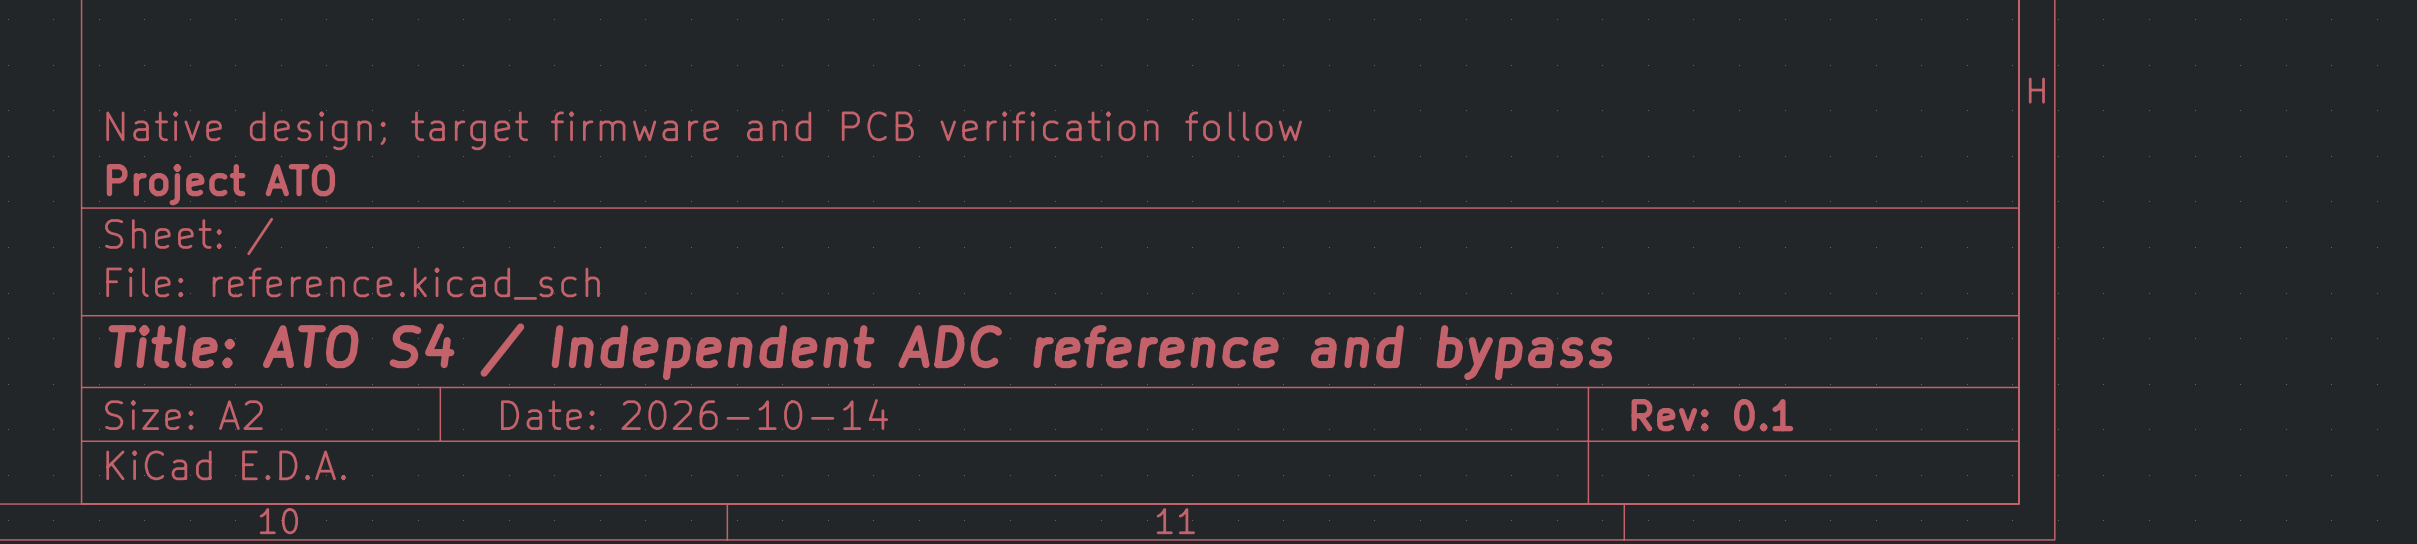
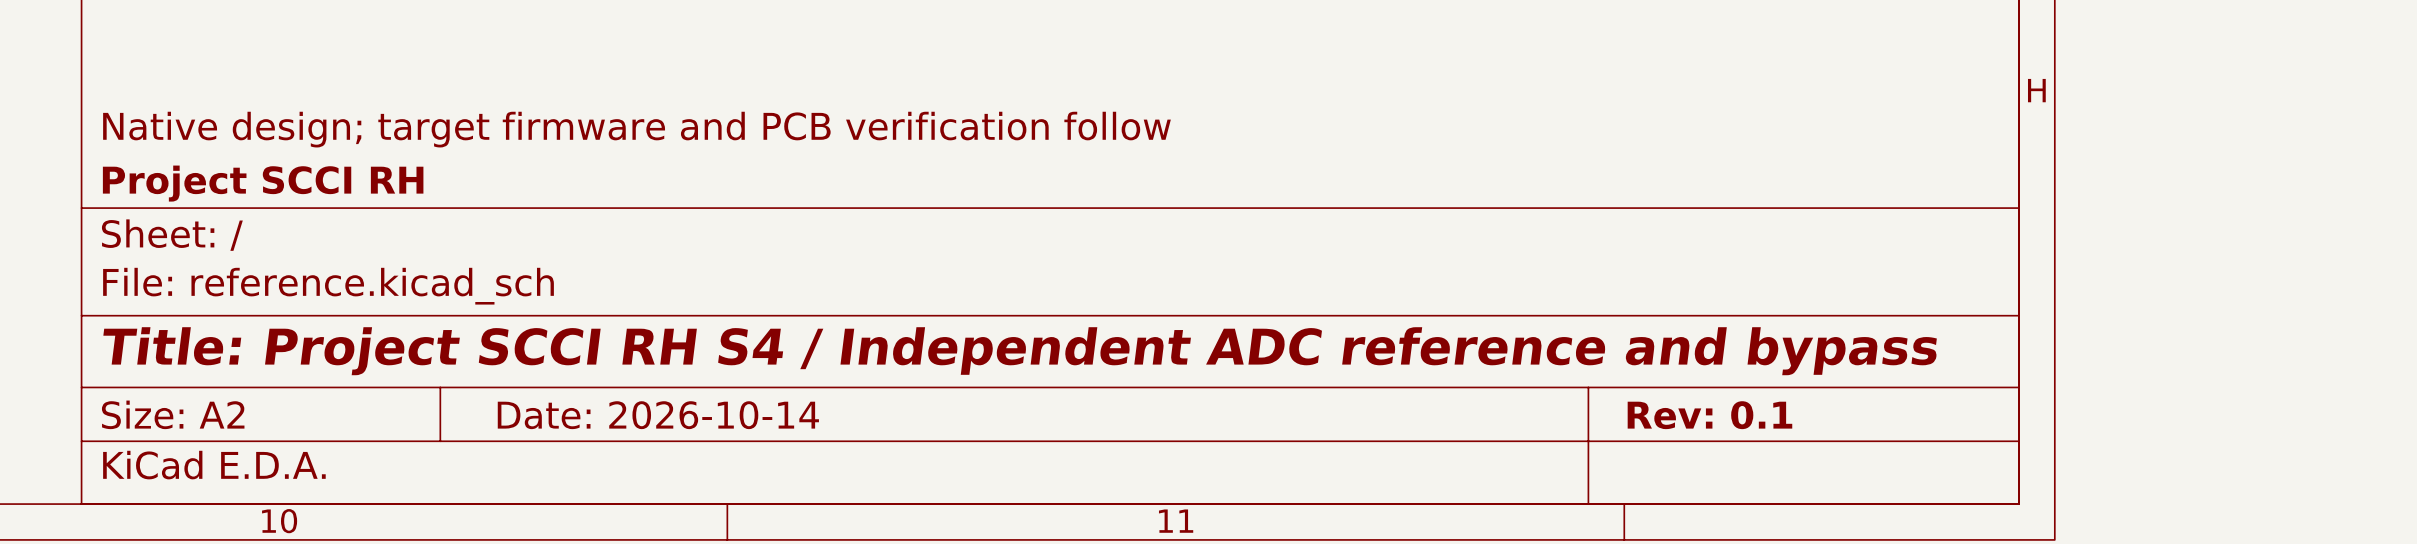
title block: Project ATO (220, 184) -> Project SCCI RH (263, 183)
title block: Title: ATO S4 / Independent ADC reference and bypass (860, 351) -> Title: Project SCCI RH S4 / Independent ADC reference and bypass (1020, 351)

